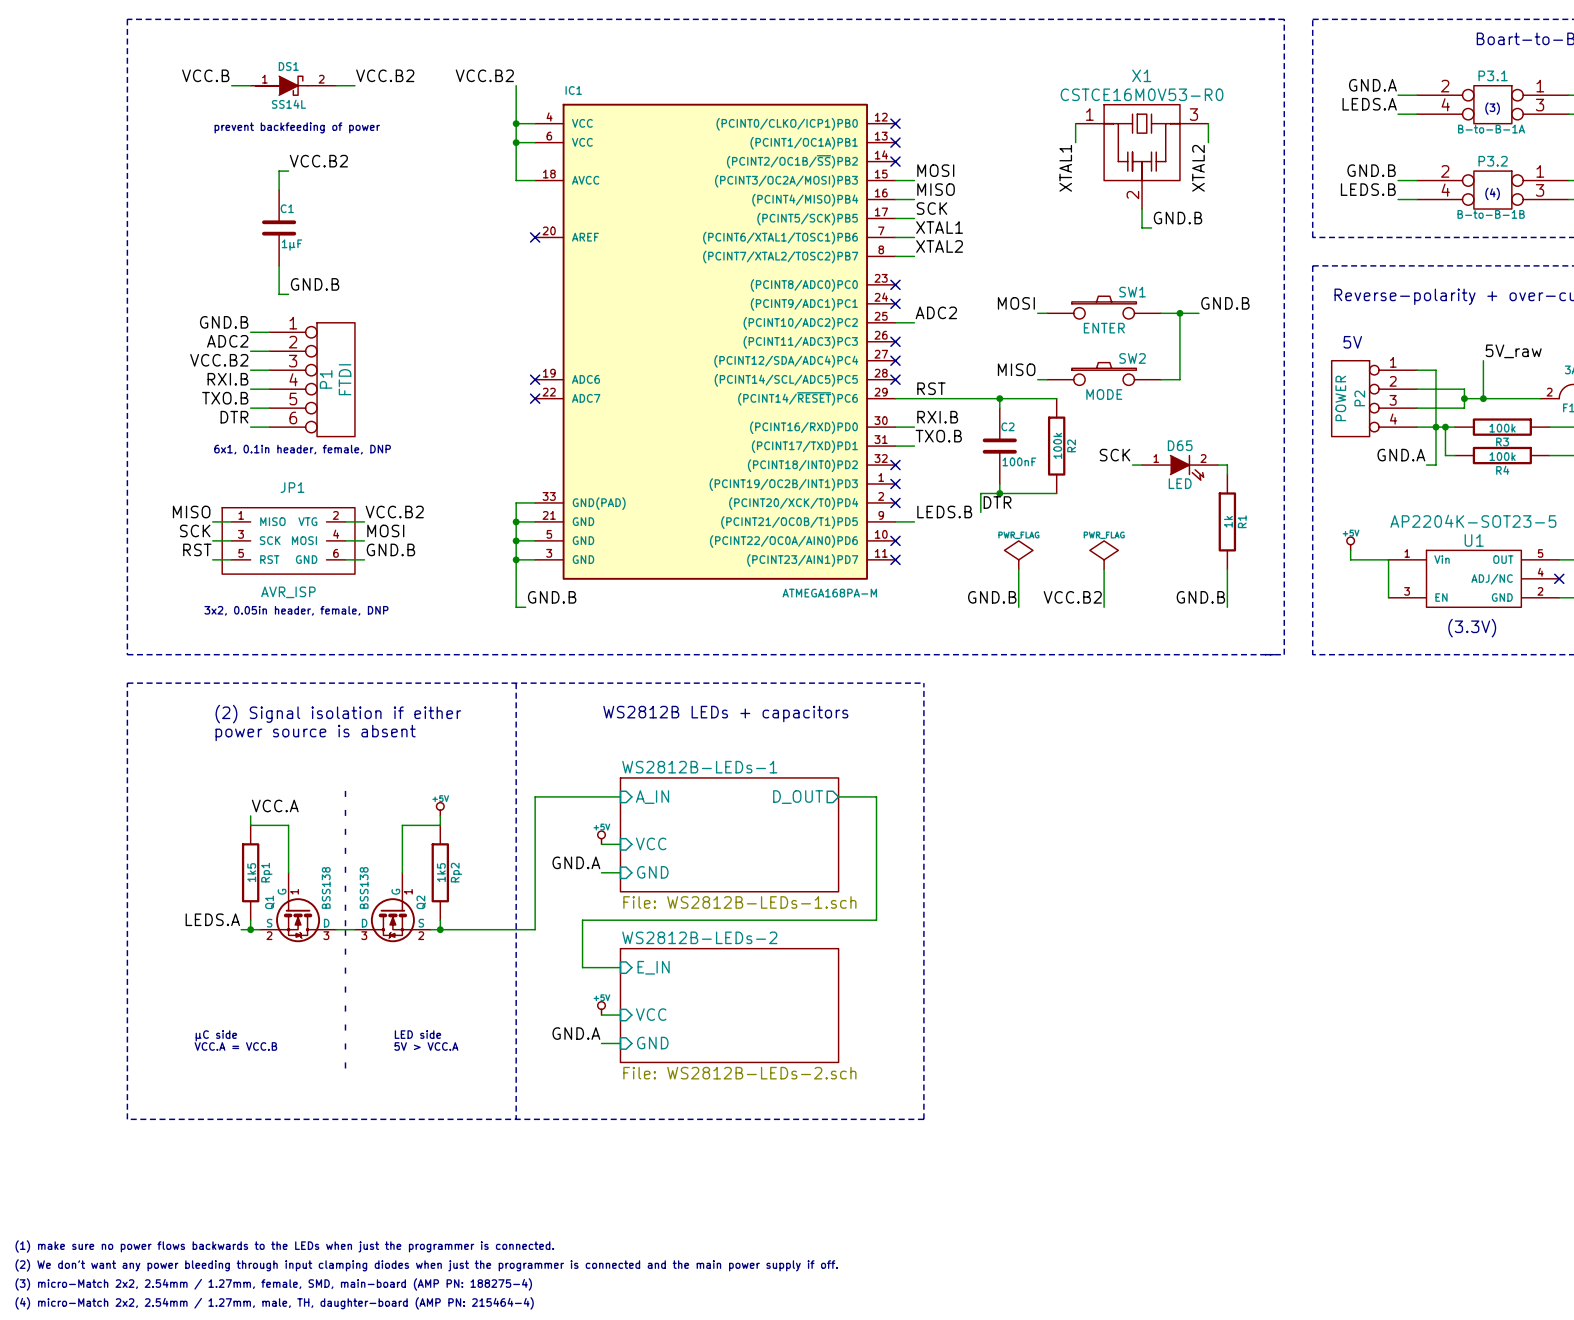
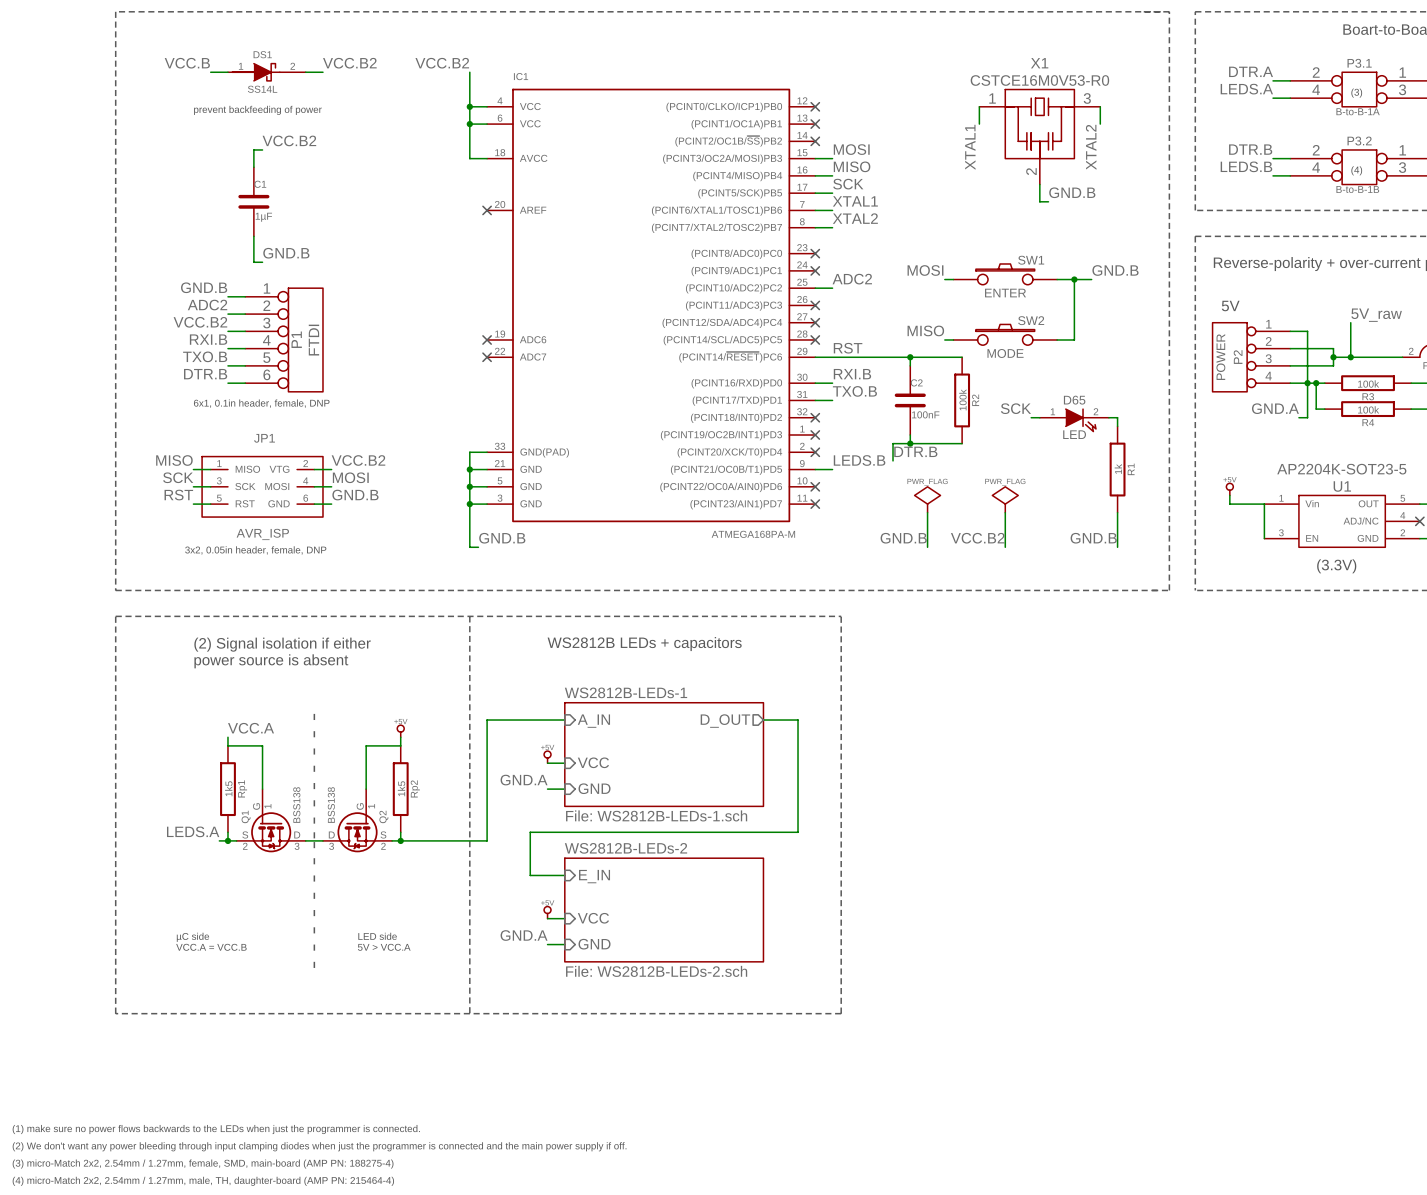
label: GND.A (1372, 85) -> DTR.A (1251, 71)
label: GND.B (1371, 170) -> DTR.B (1250, 149)
label: DTR (234, 417) -> DTR.B (205, 374)
label: DTR (997, 502) -> DTR.B (915, 451)

